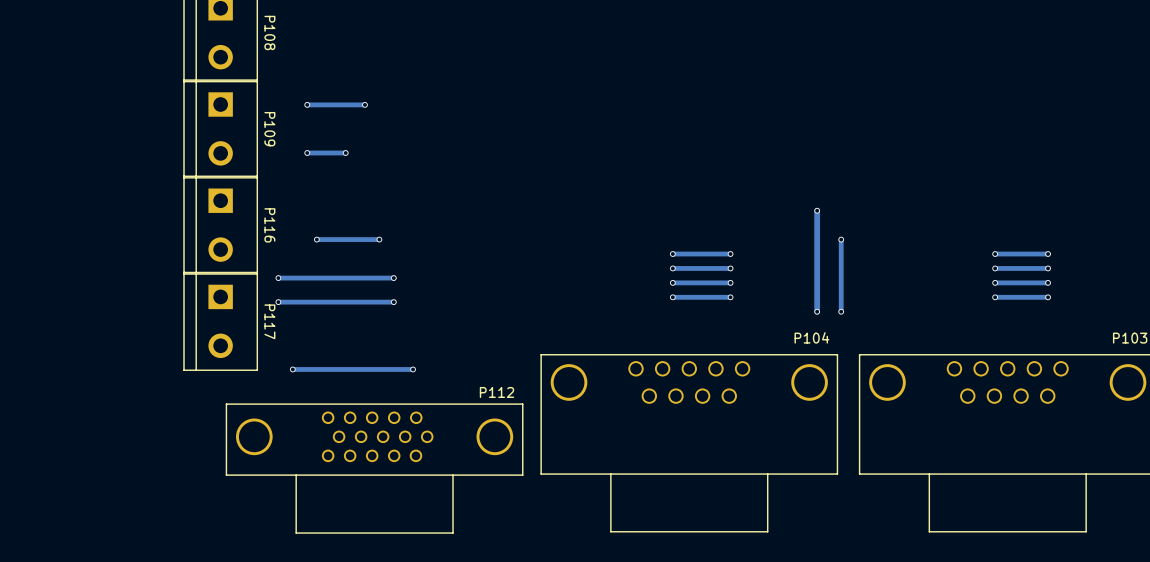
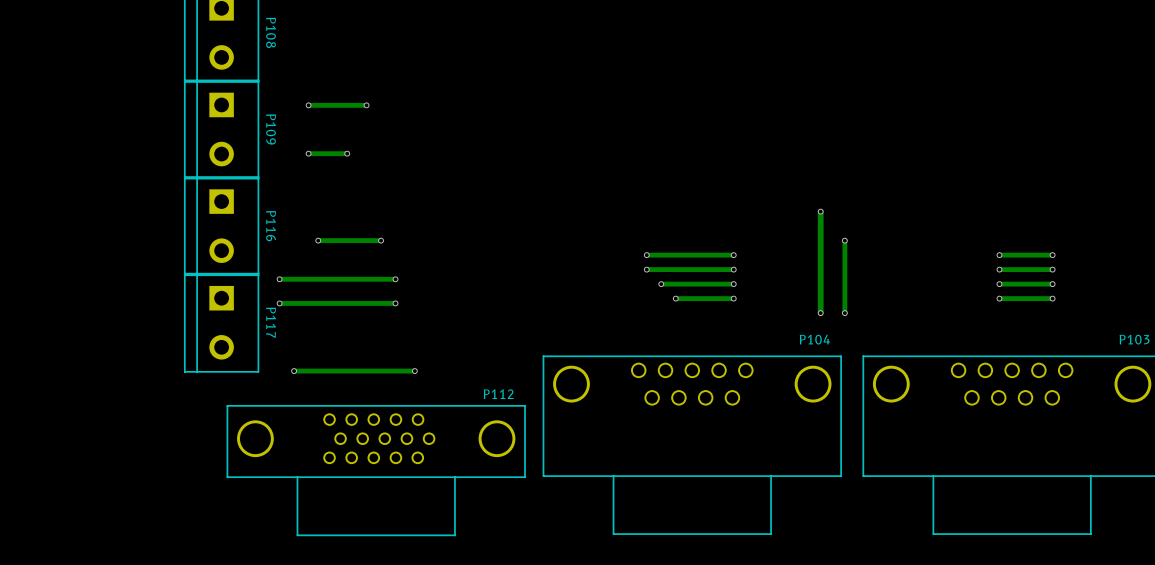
via: none -> (646, 255)
track: none -> (675, 255) (646, 255)
via: (672, 254) -> none
via: none -> (646, 269)
track: none -> (675, 269) (646, 269)
via: (672, 268) -> none
via: none -> (661, 284)
track: none -> (675, 284) (661, 284)
via: (672, 282) -> none

